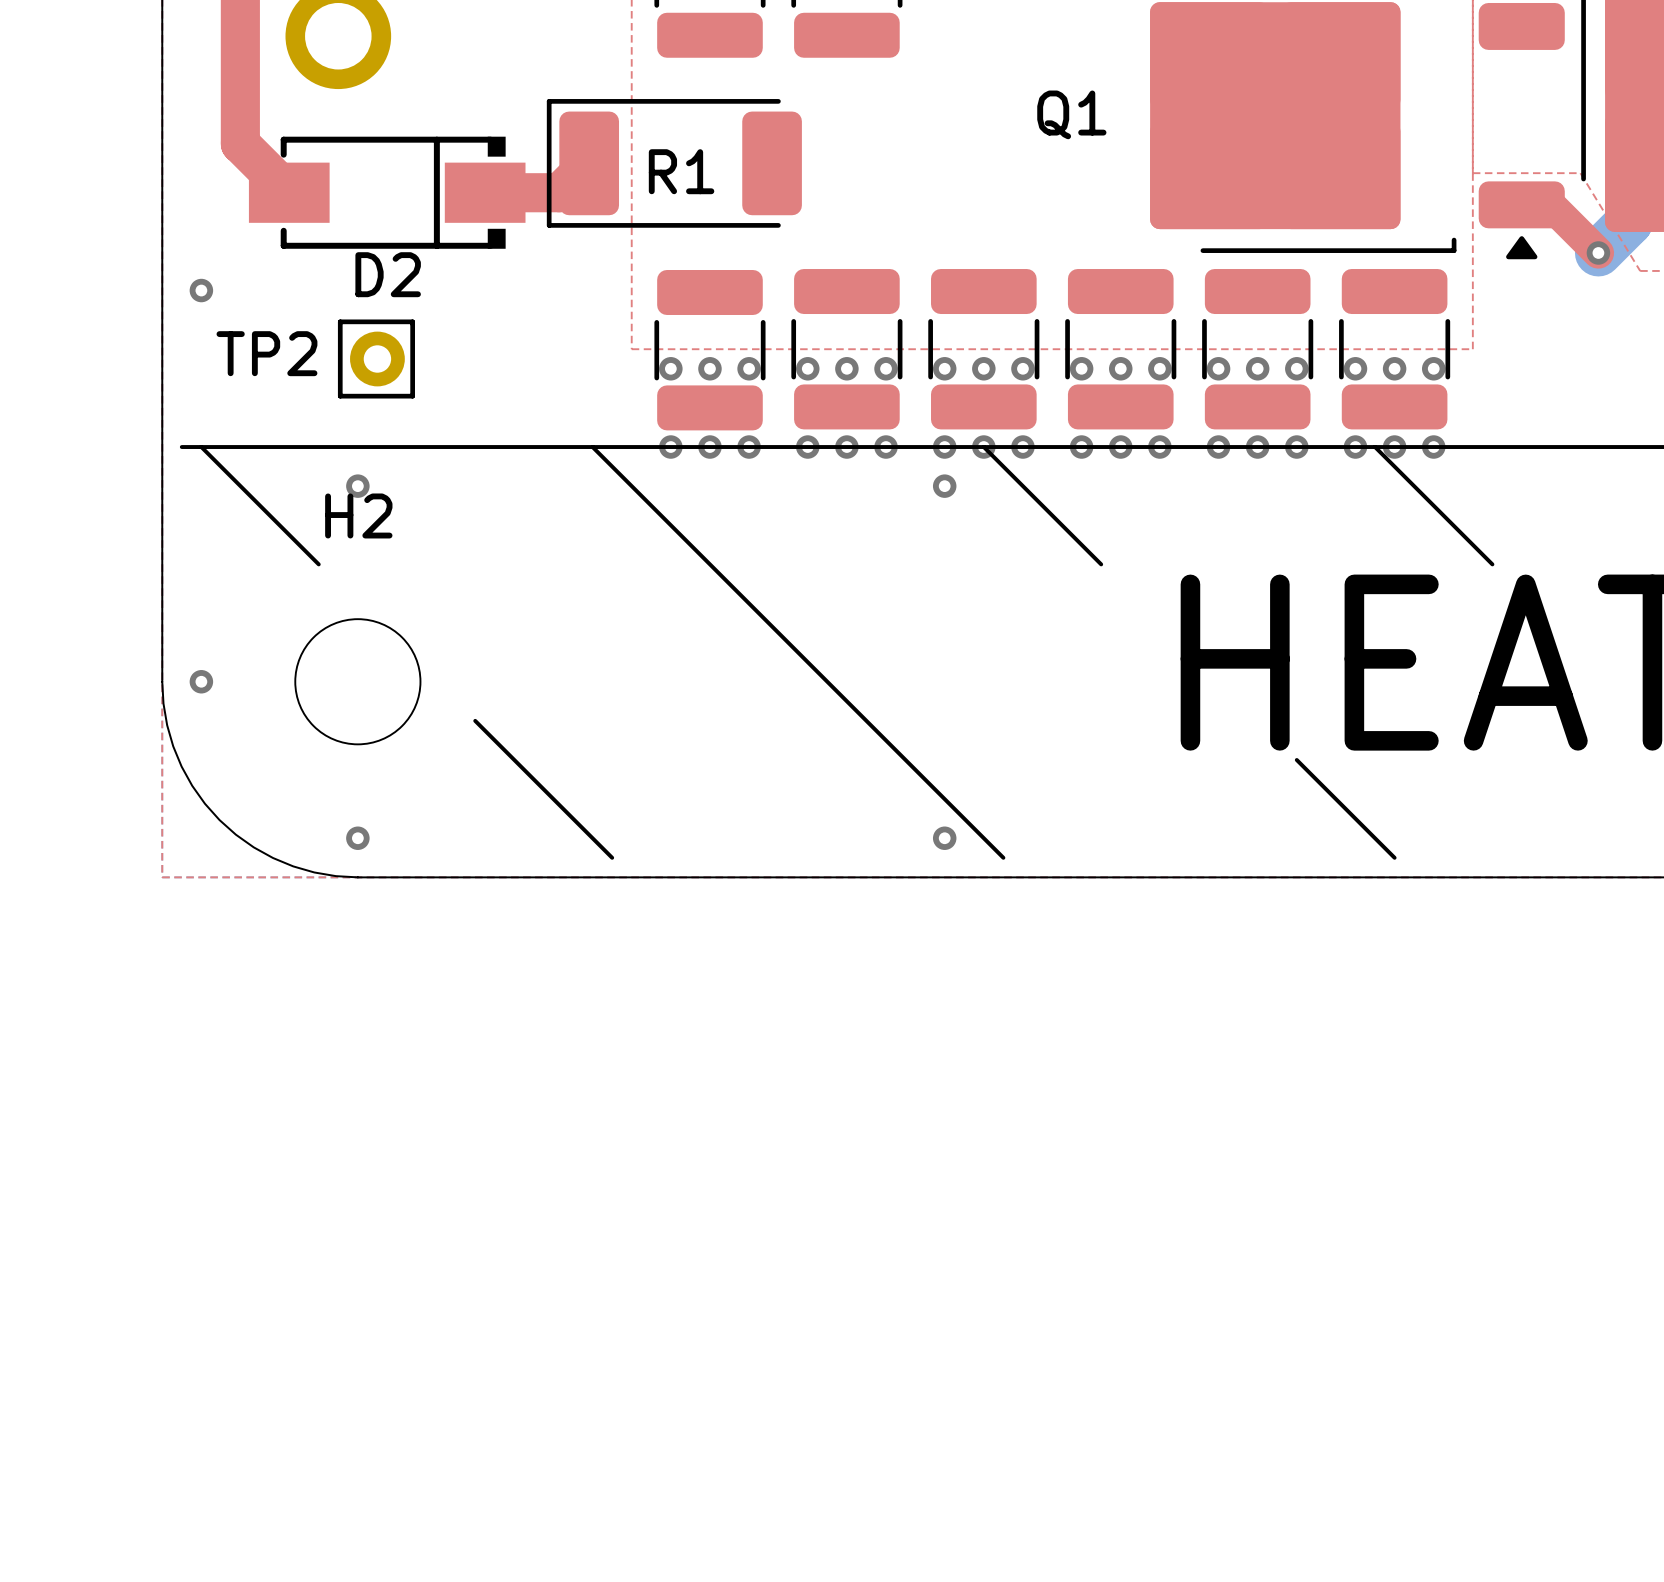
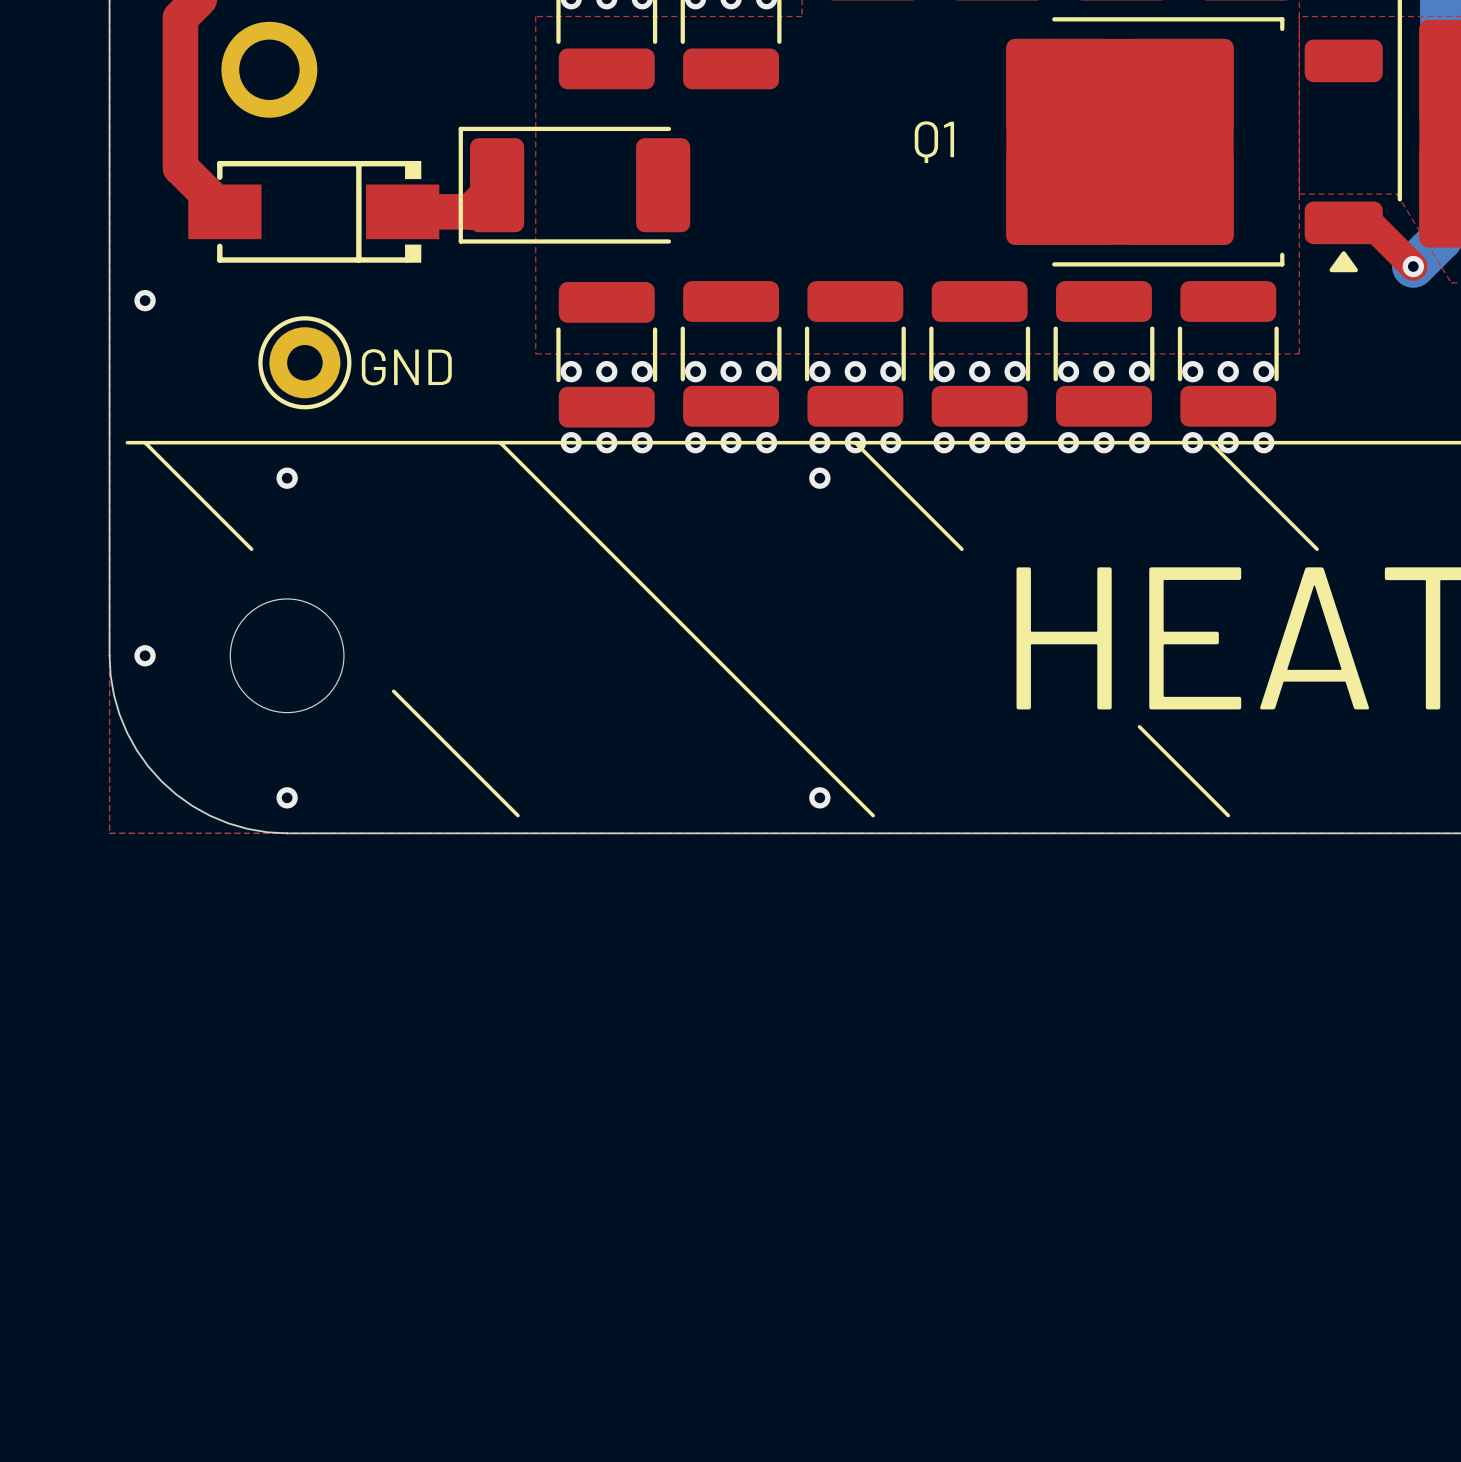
R1 name: R1 (681, 171) -> none
D2 name: D2 (388, 274) -> none
TP2: (376, 359) -> none
part: none -> (304, 362)
text: none -> GND (406, 367)
H2 name: H2 (358, 515) -> none

